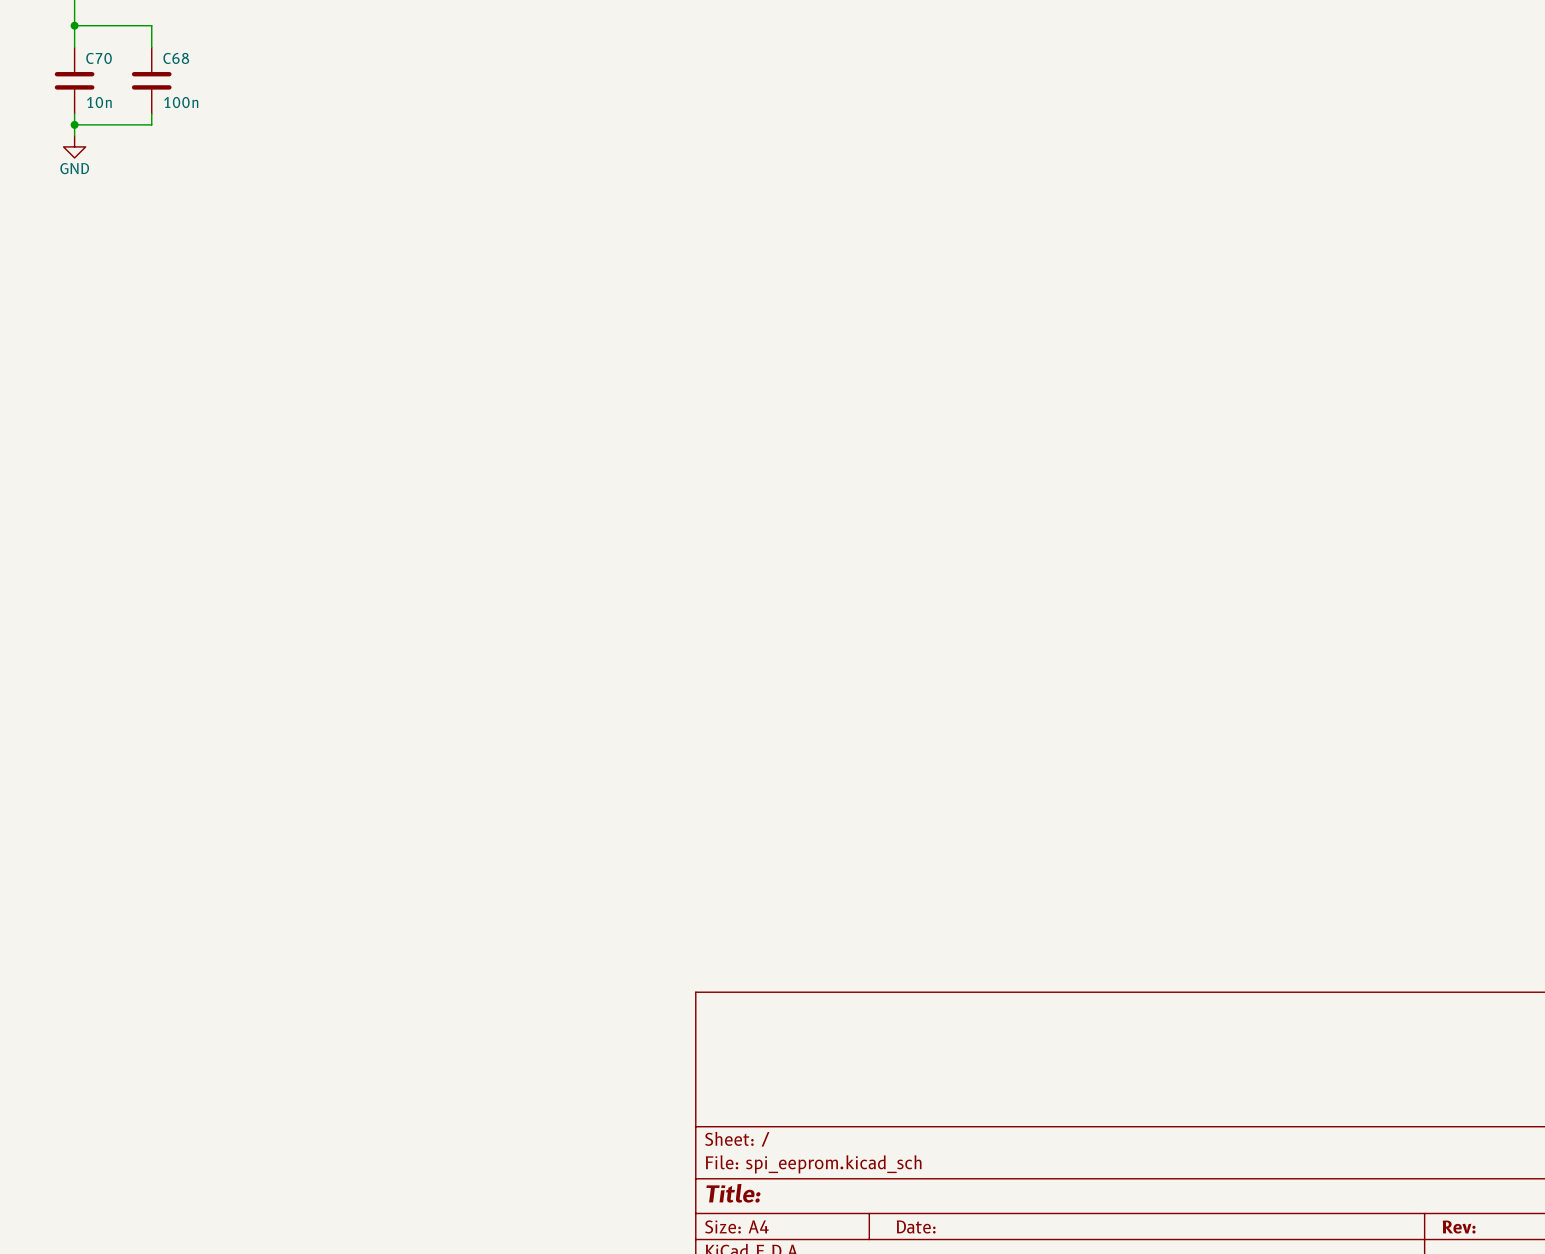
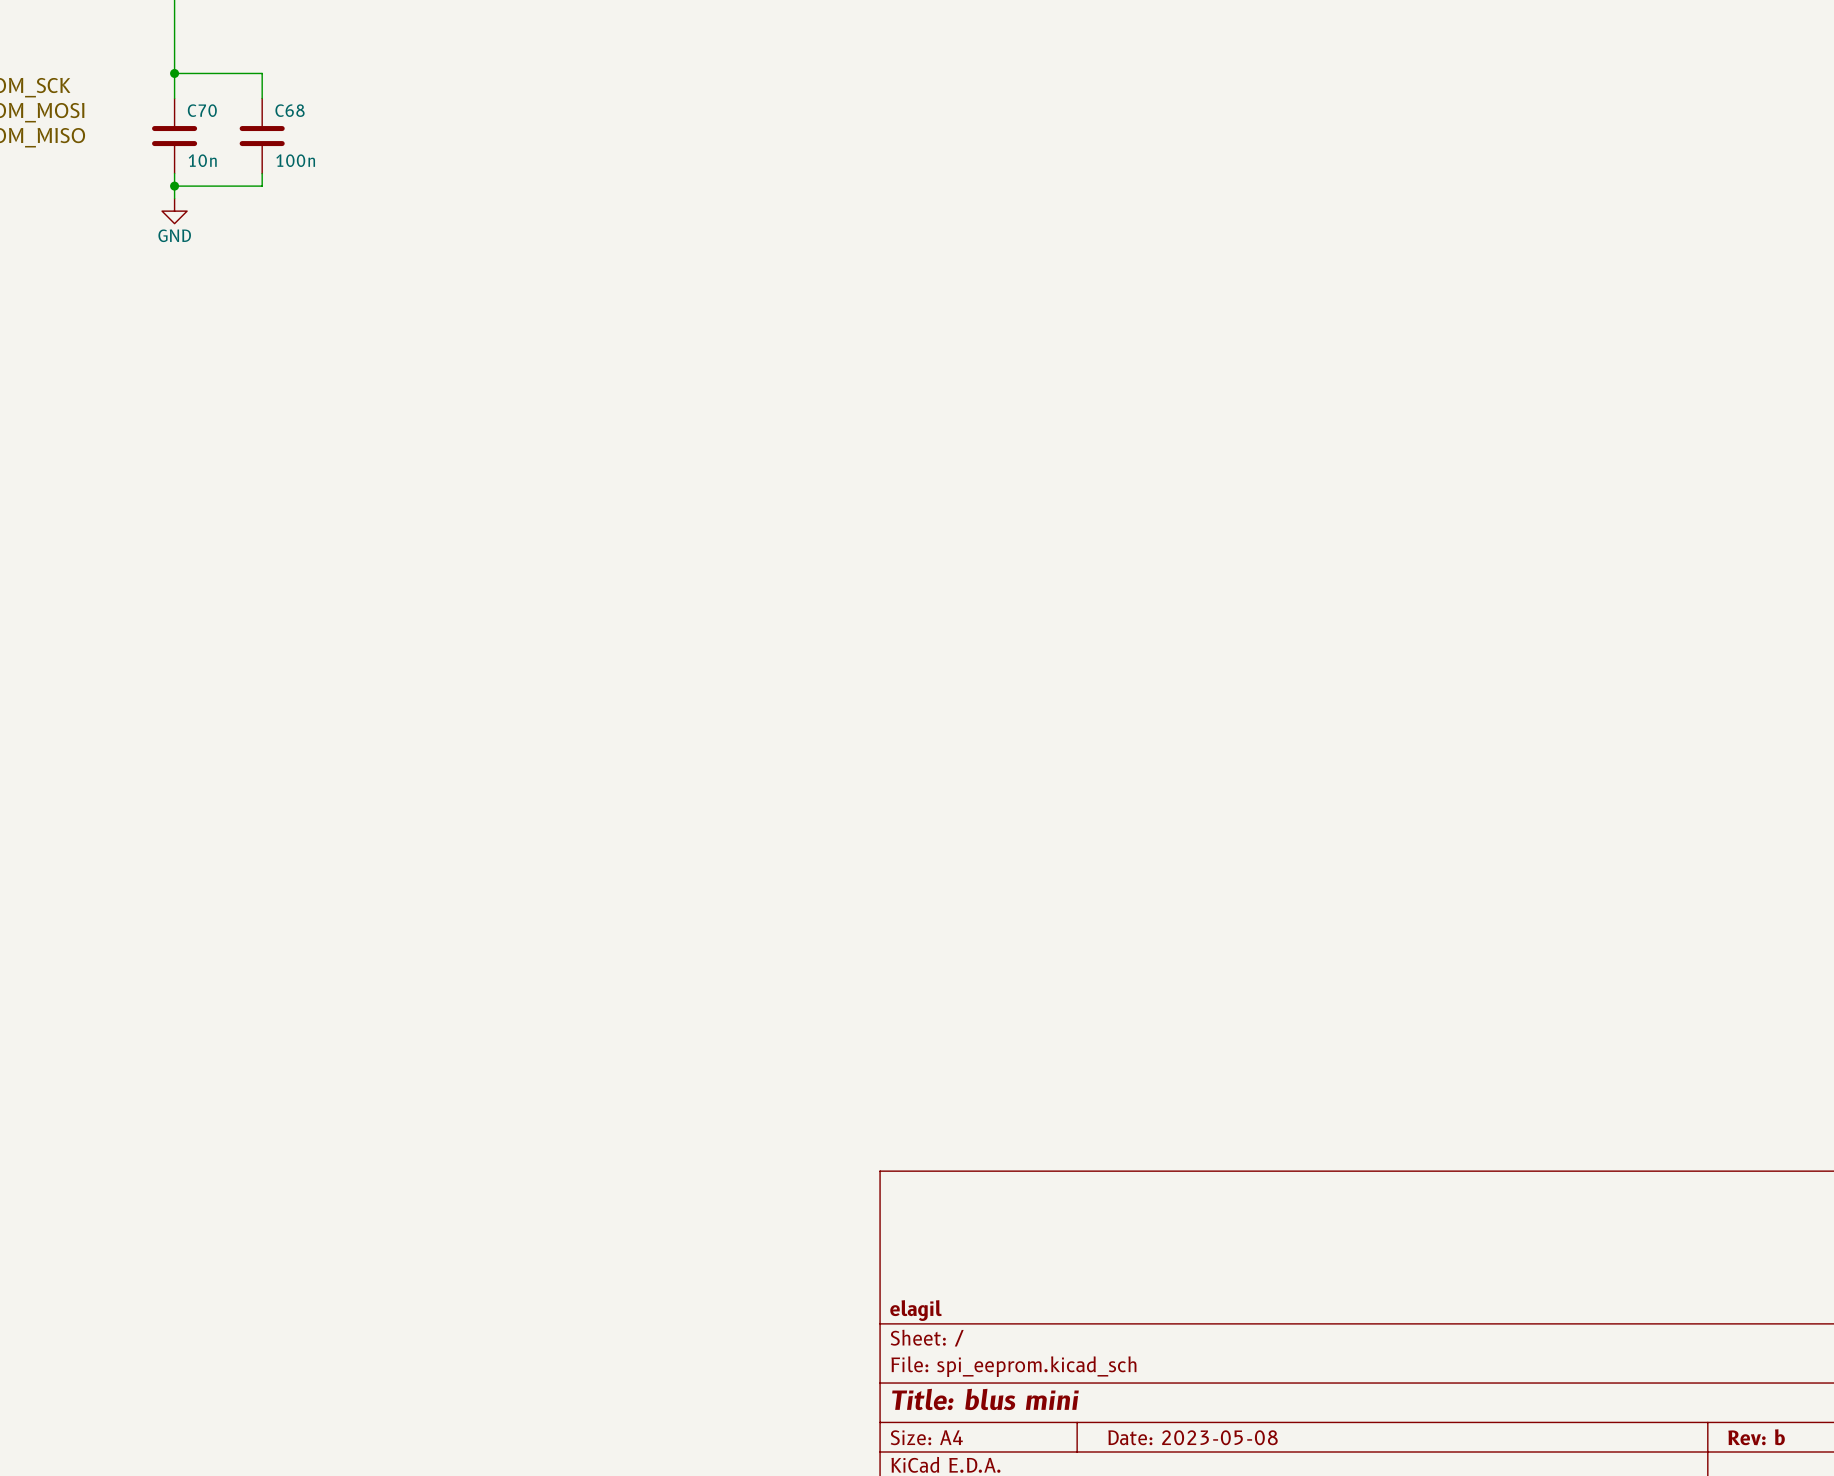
title block: none -> elagil (916, 1310)
title block: Title: (733, 1193) -> Title: blus mini (985, 1399)
title block: Date: (916, 1226) -> Date: 2023-05-08 (1193, 1437)
title block: Rev: (1459, 1227) -> Rev: b (1756, 1437)

